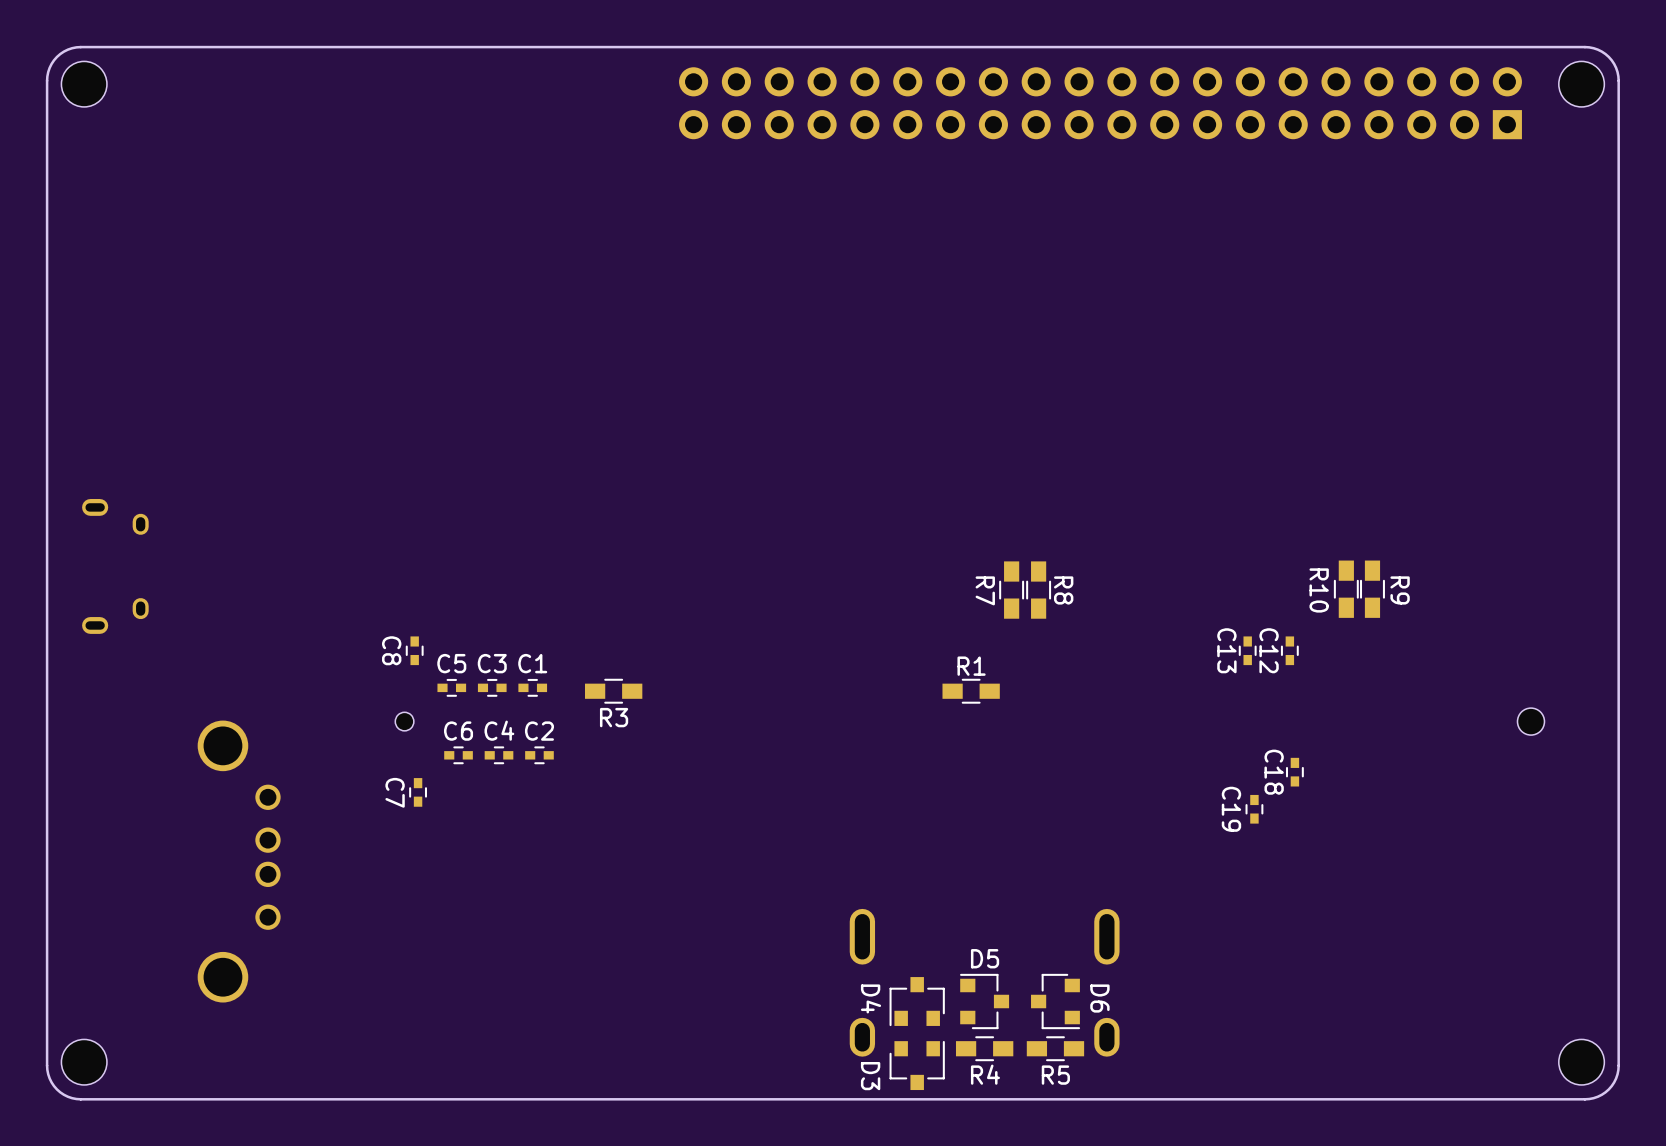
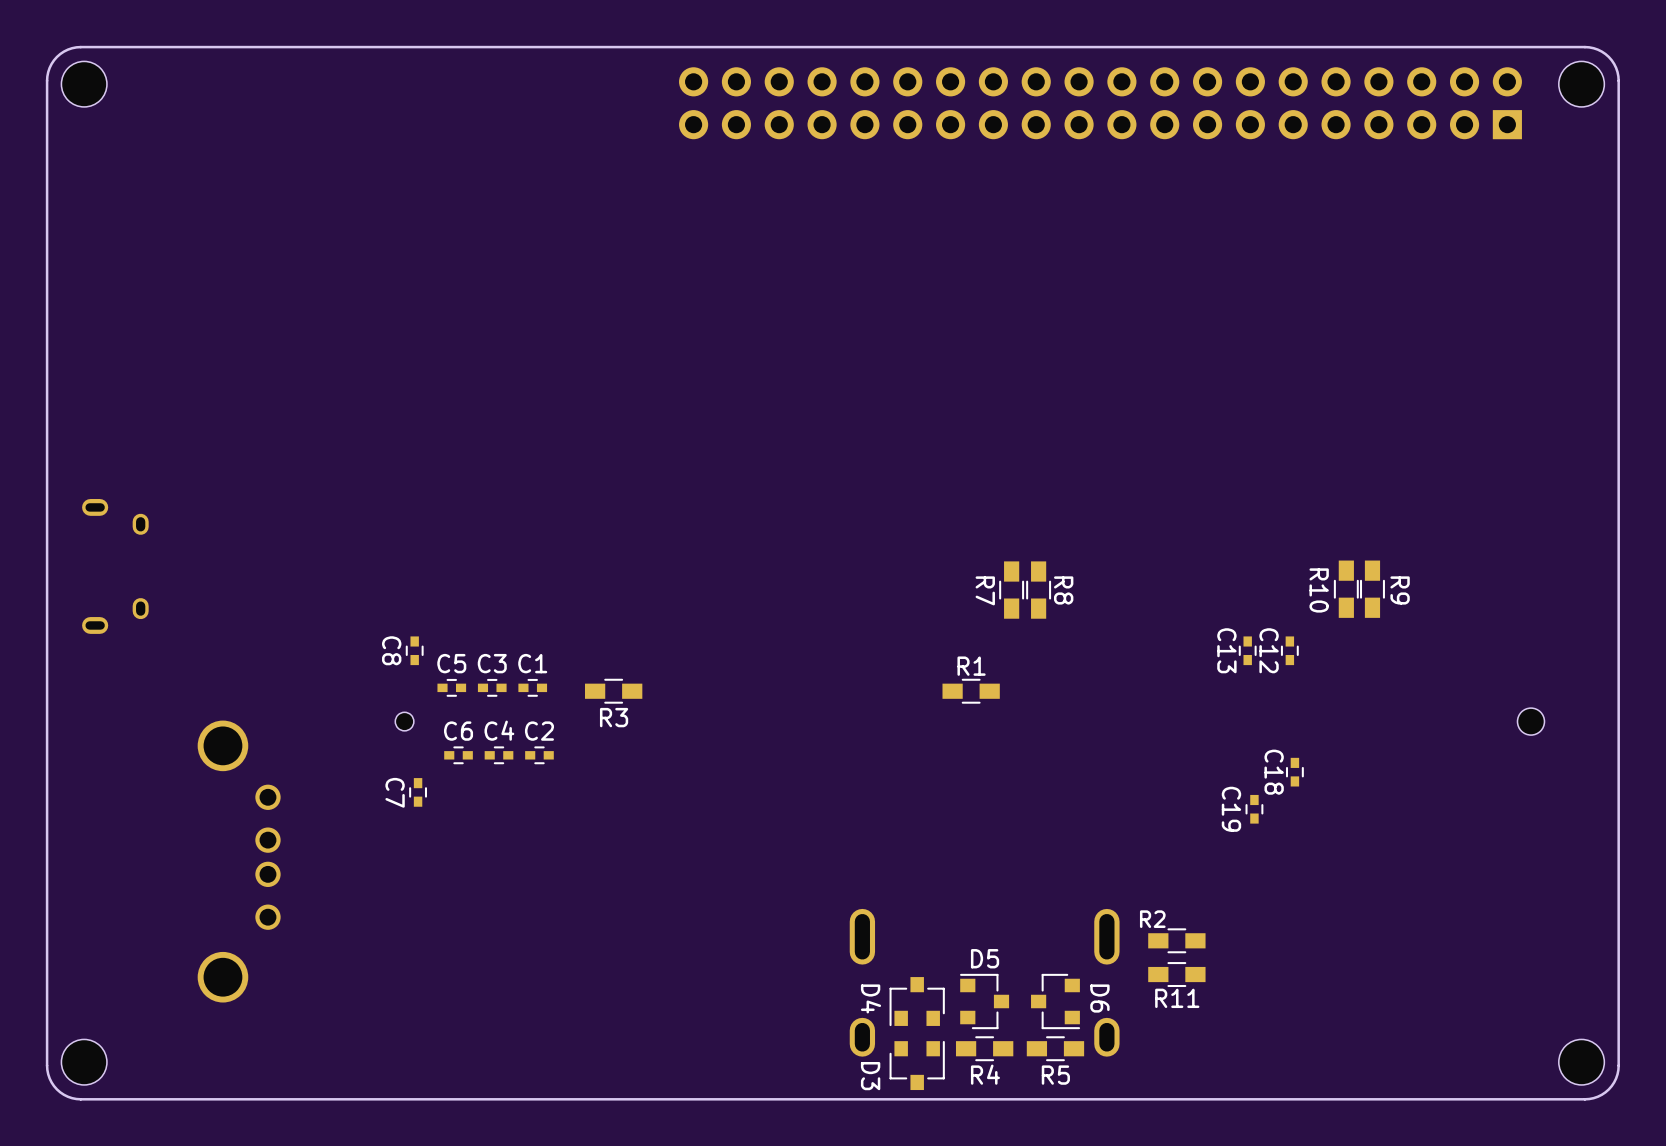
R2: none -> (1176, 940)
R11: none -> (1176, 974)

